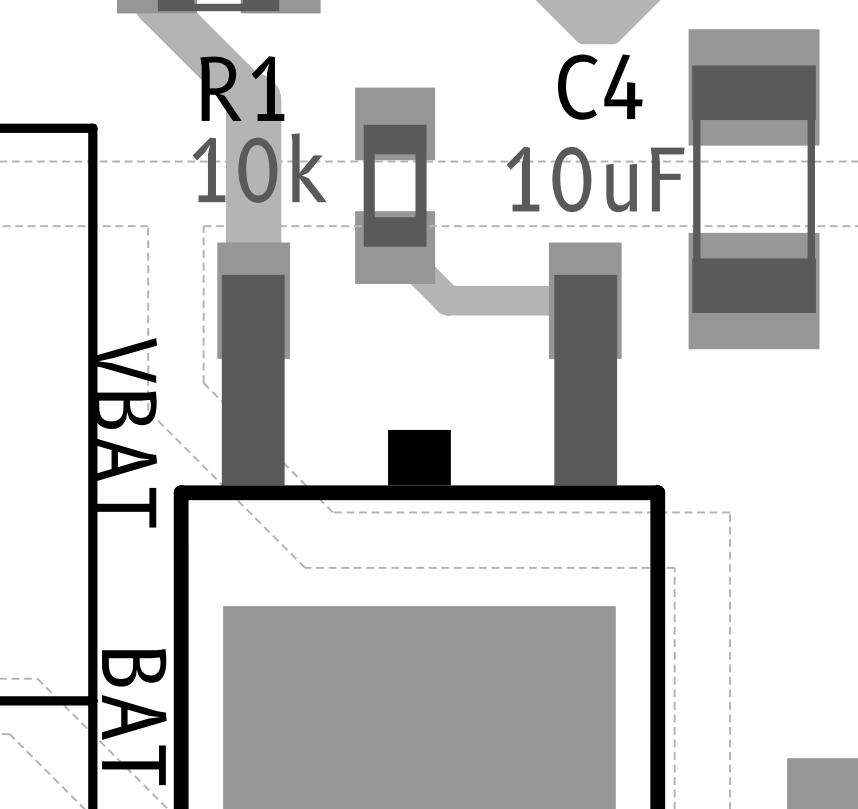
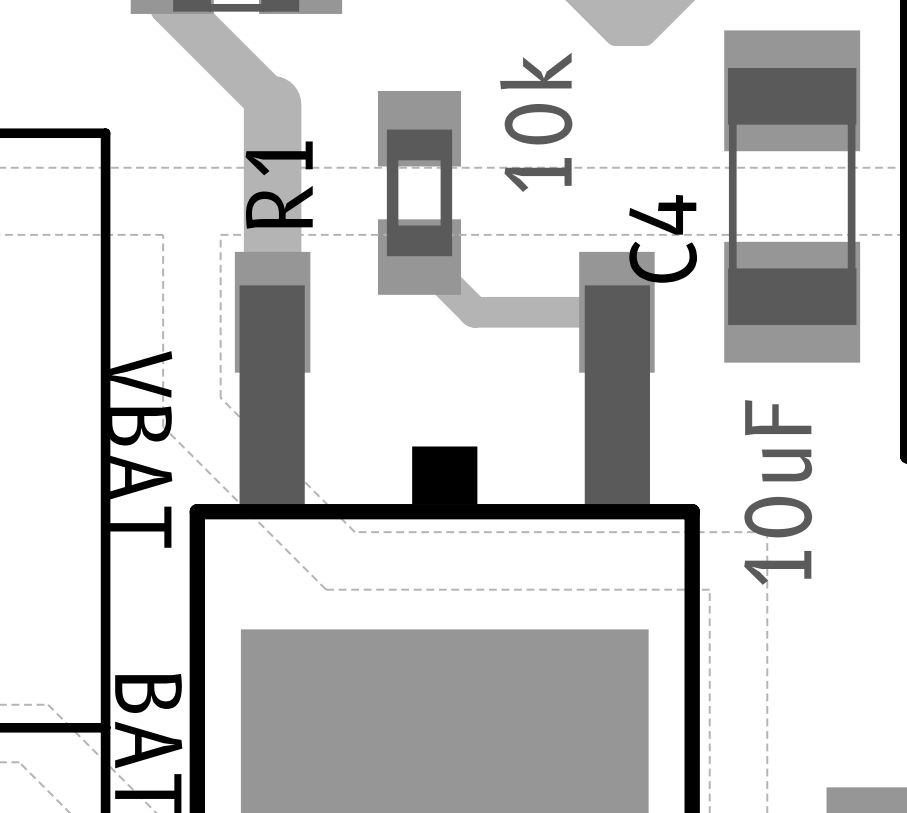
C4 name rotation: 0° (600, 87) -> 90° counterclockwise (663, 238)
C4 name position: C4 (600, 87) -> C4 (663, 238)
R1 name rotation: 0° (242, 88) -> 90° counterclockwise (279, 185)
R1 value rotation: 0° (259, 168) -> 90° counterclockwise (536, 122)
R1 value position: 10k (259, 168) -> 10k (536, 122)
C4 value rotation: 0° (595, 179) -> 90° counterclockwise (778, 492)
C4 value position: 10uF (595, 179) -> 10uF (778, 492)

